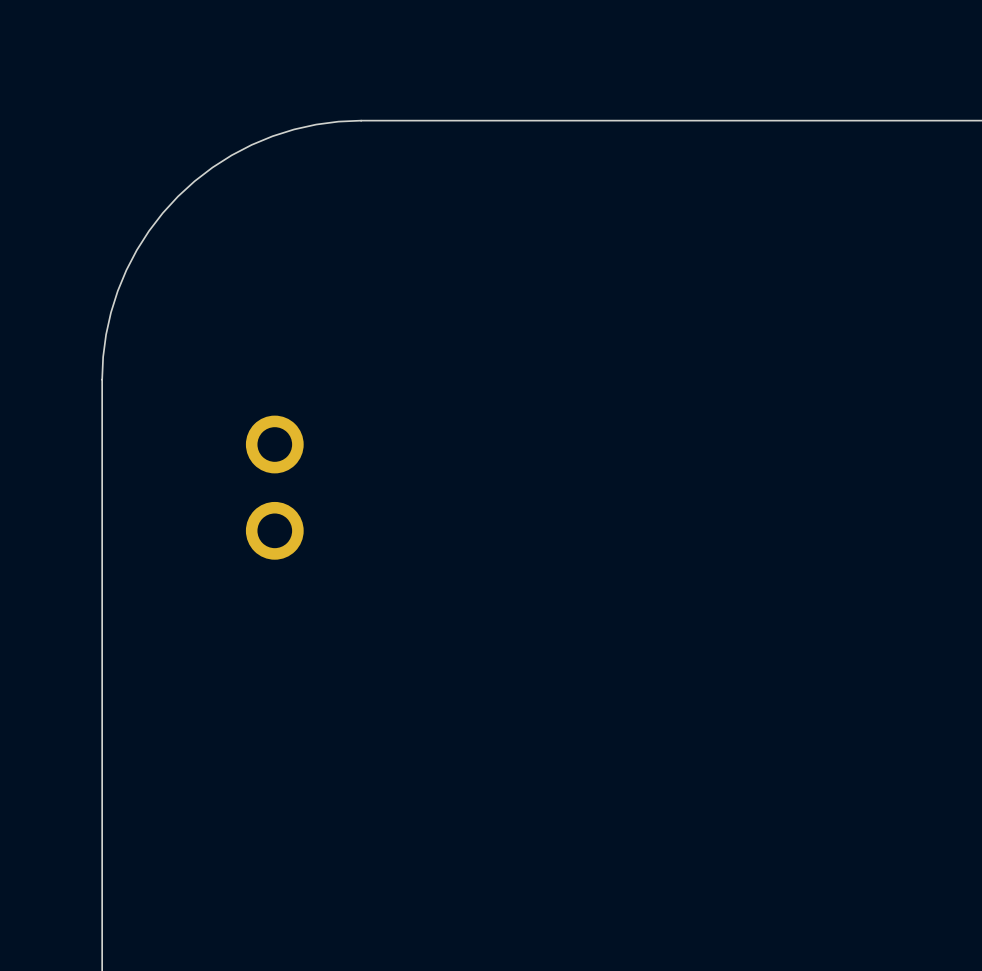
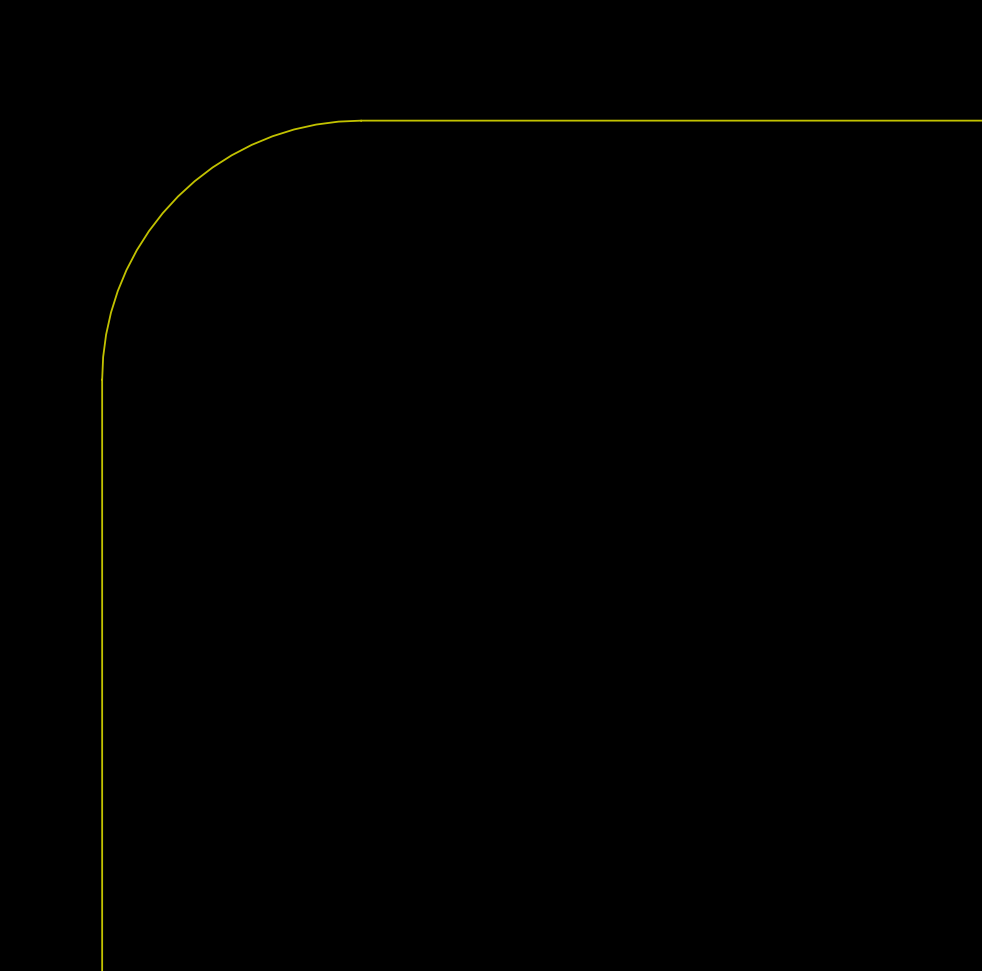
part: (274, 487) -> none

